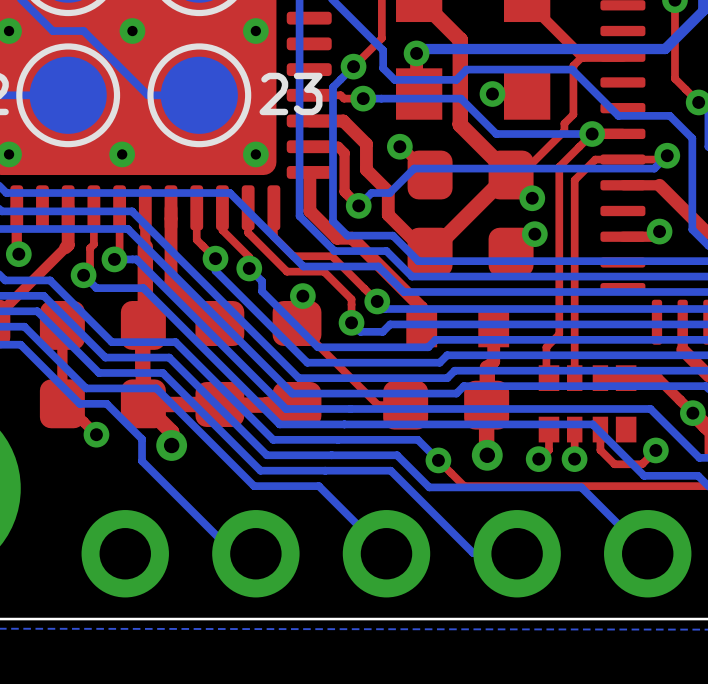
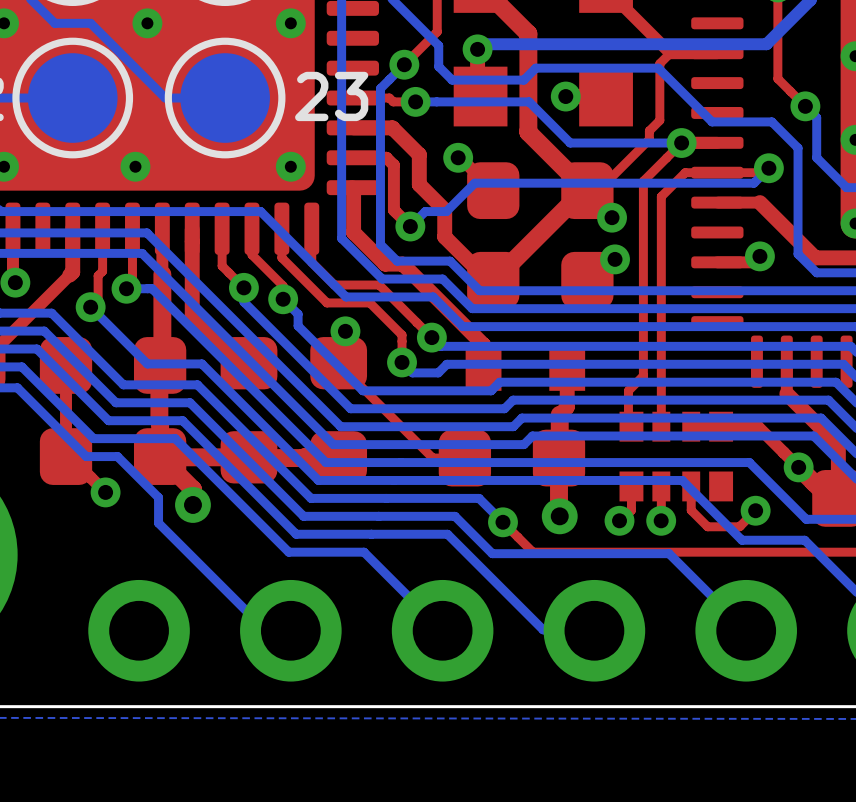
bottom track: (96, 288) (143, 288) (179, 324) -> (105, 322) (147, 363) (201, 363)

